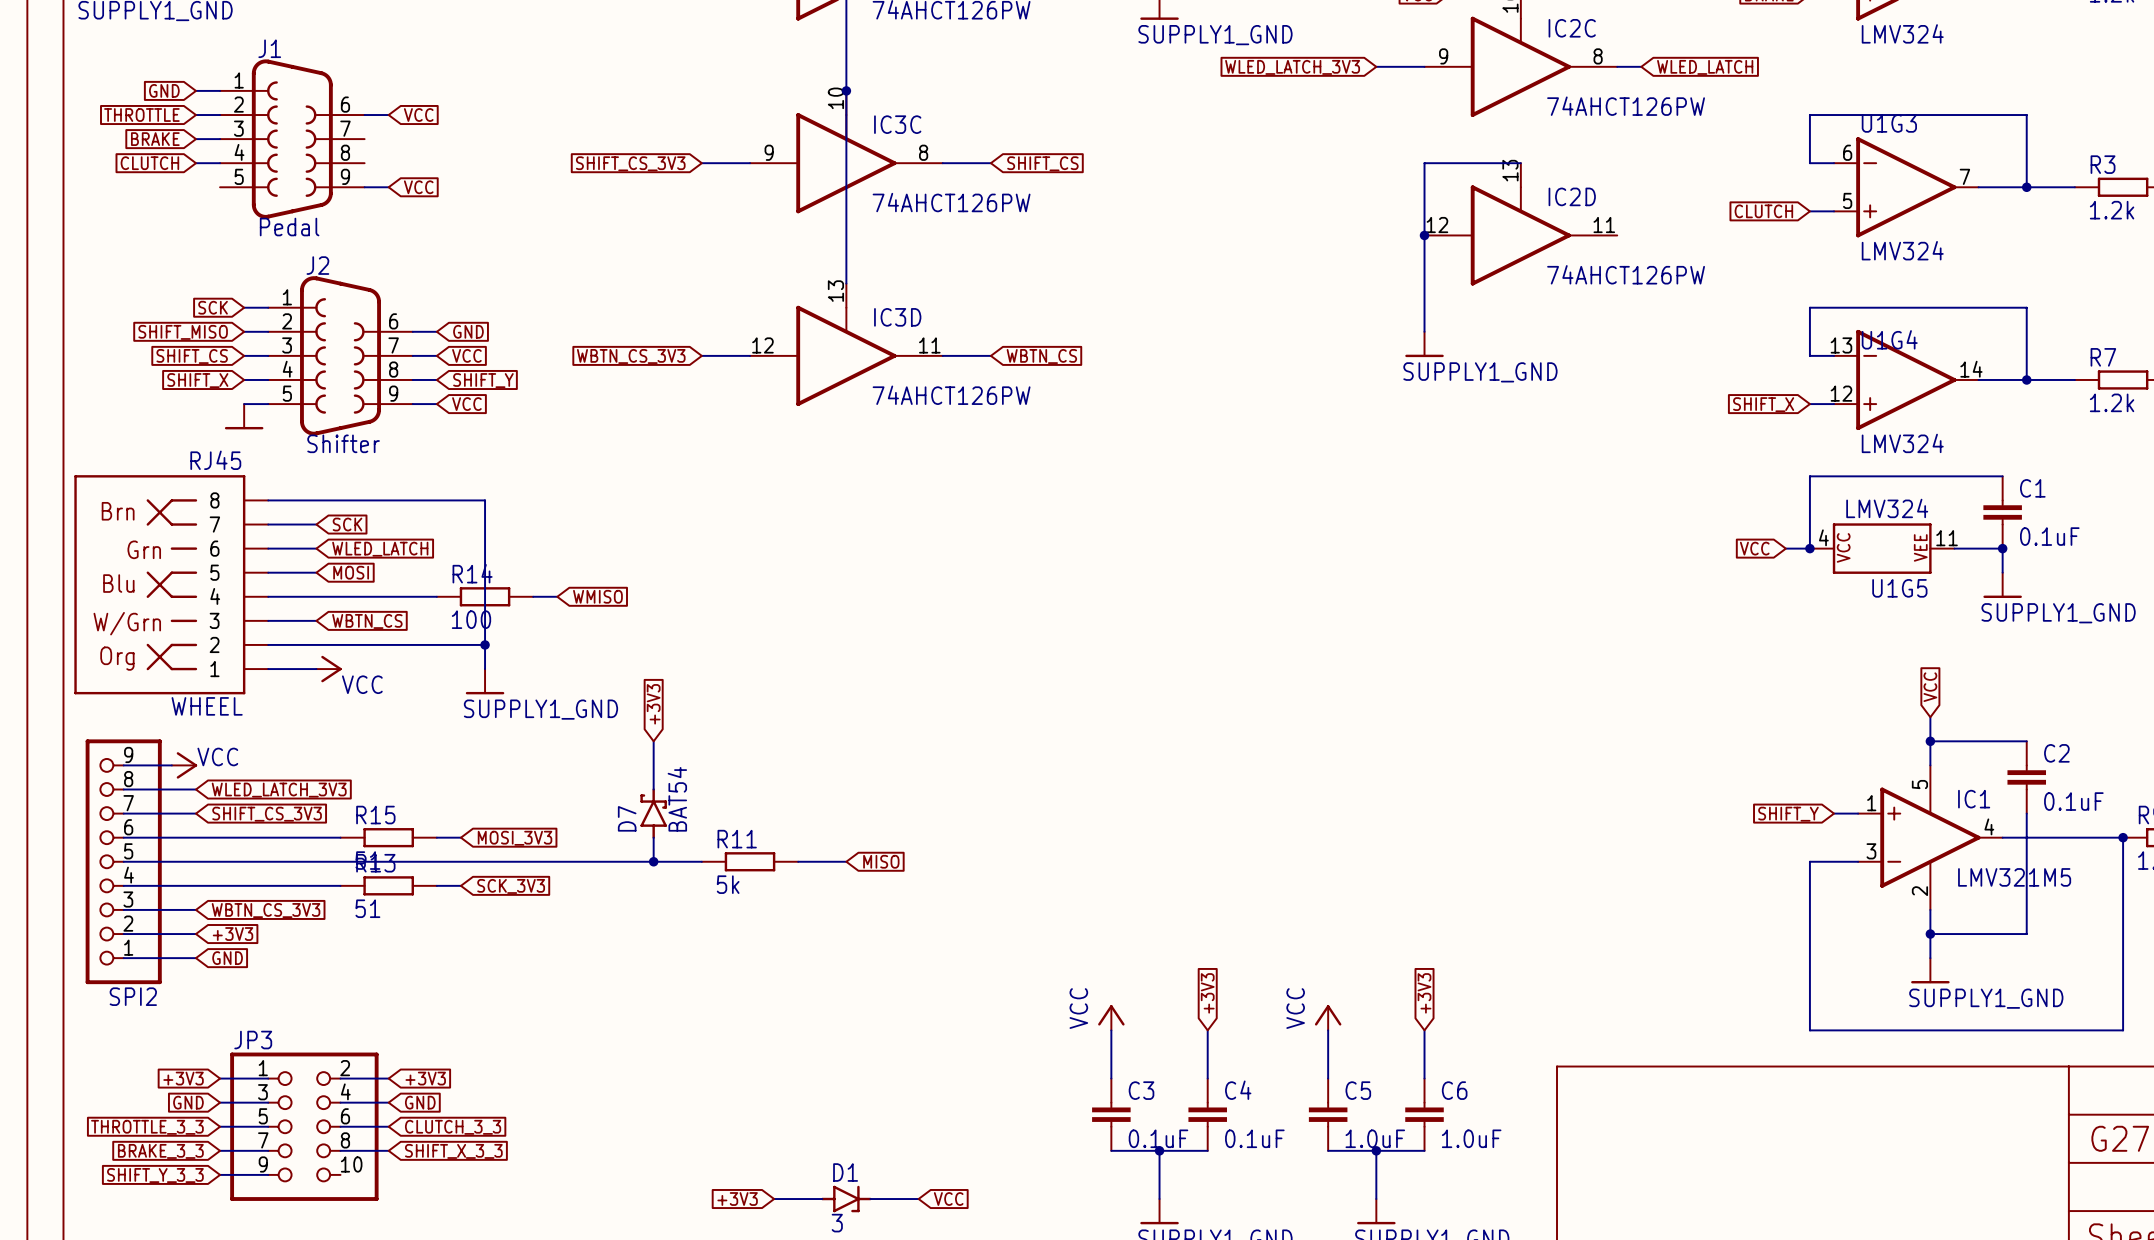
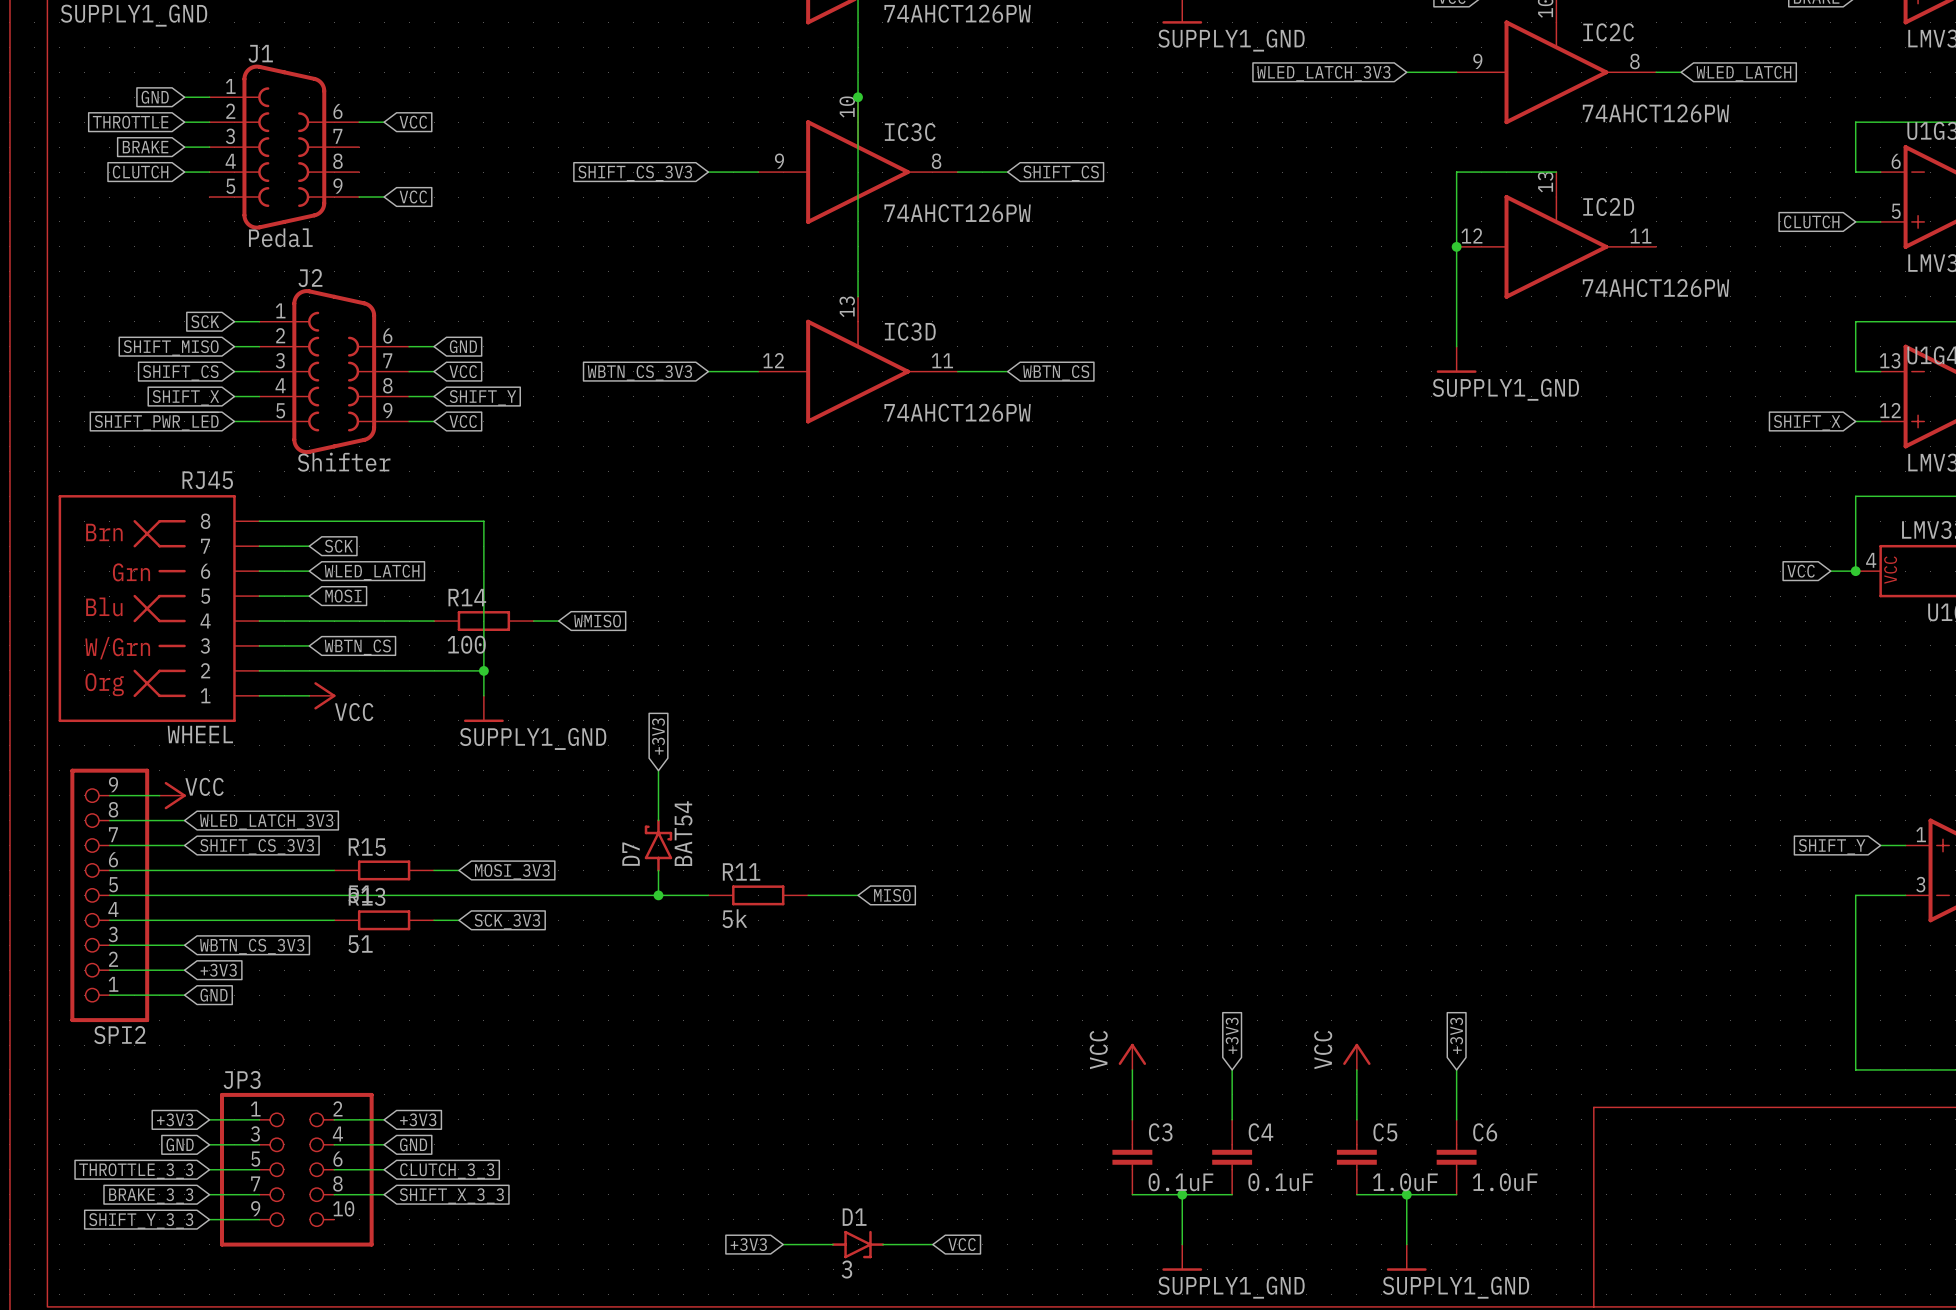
global label: none -> ~{SHIFT_PWR_LED} (156, 421)
power symbol: (244, 416) -> none

